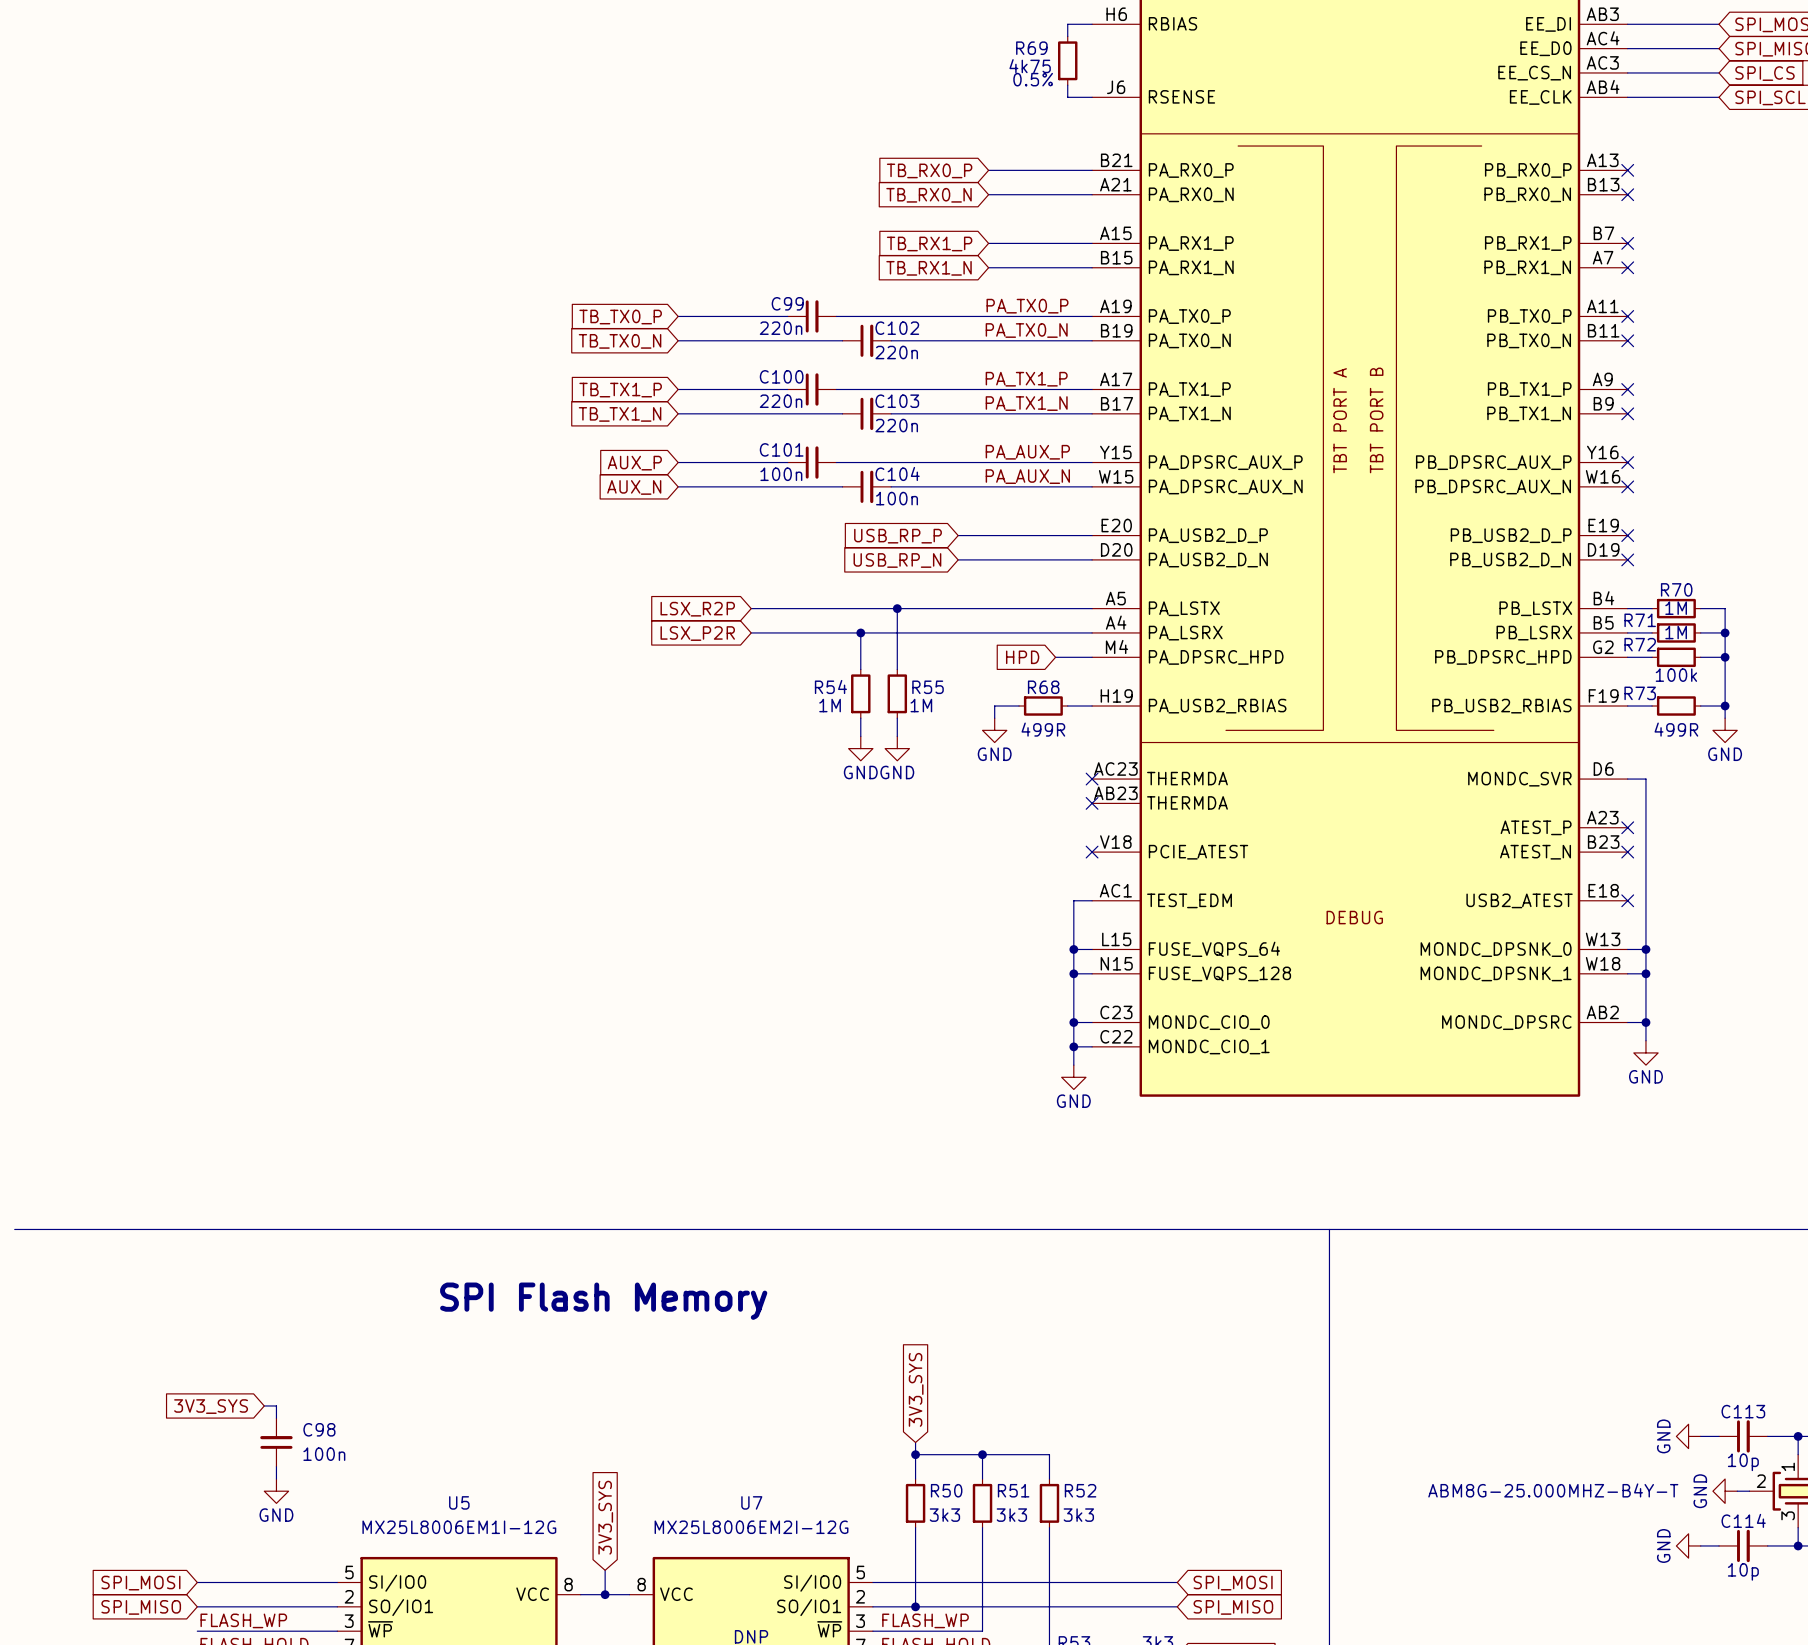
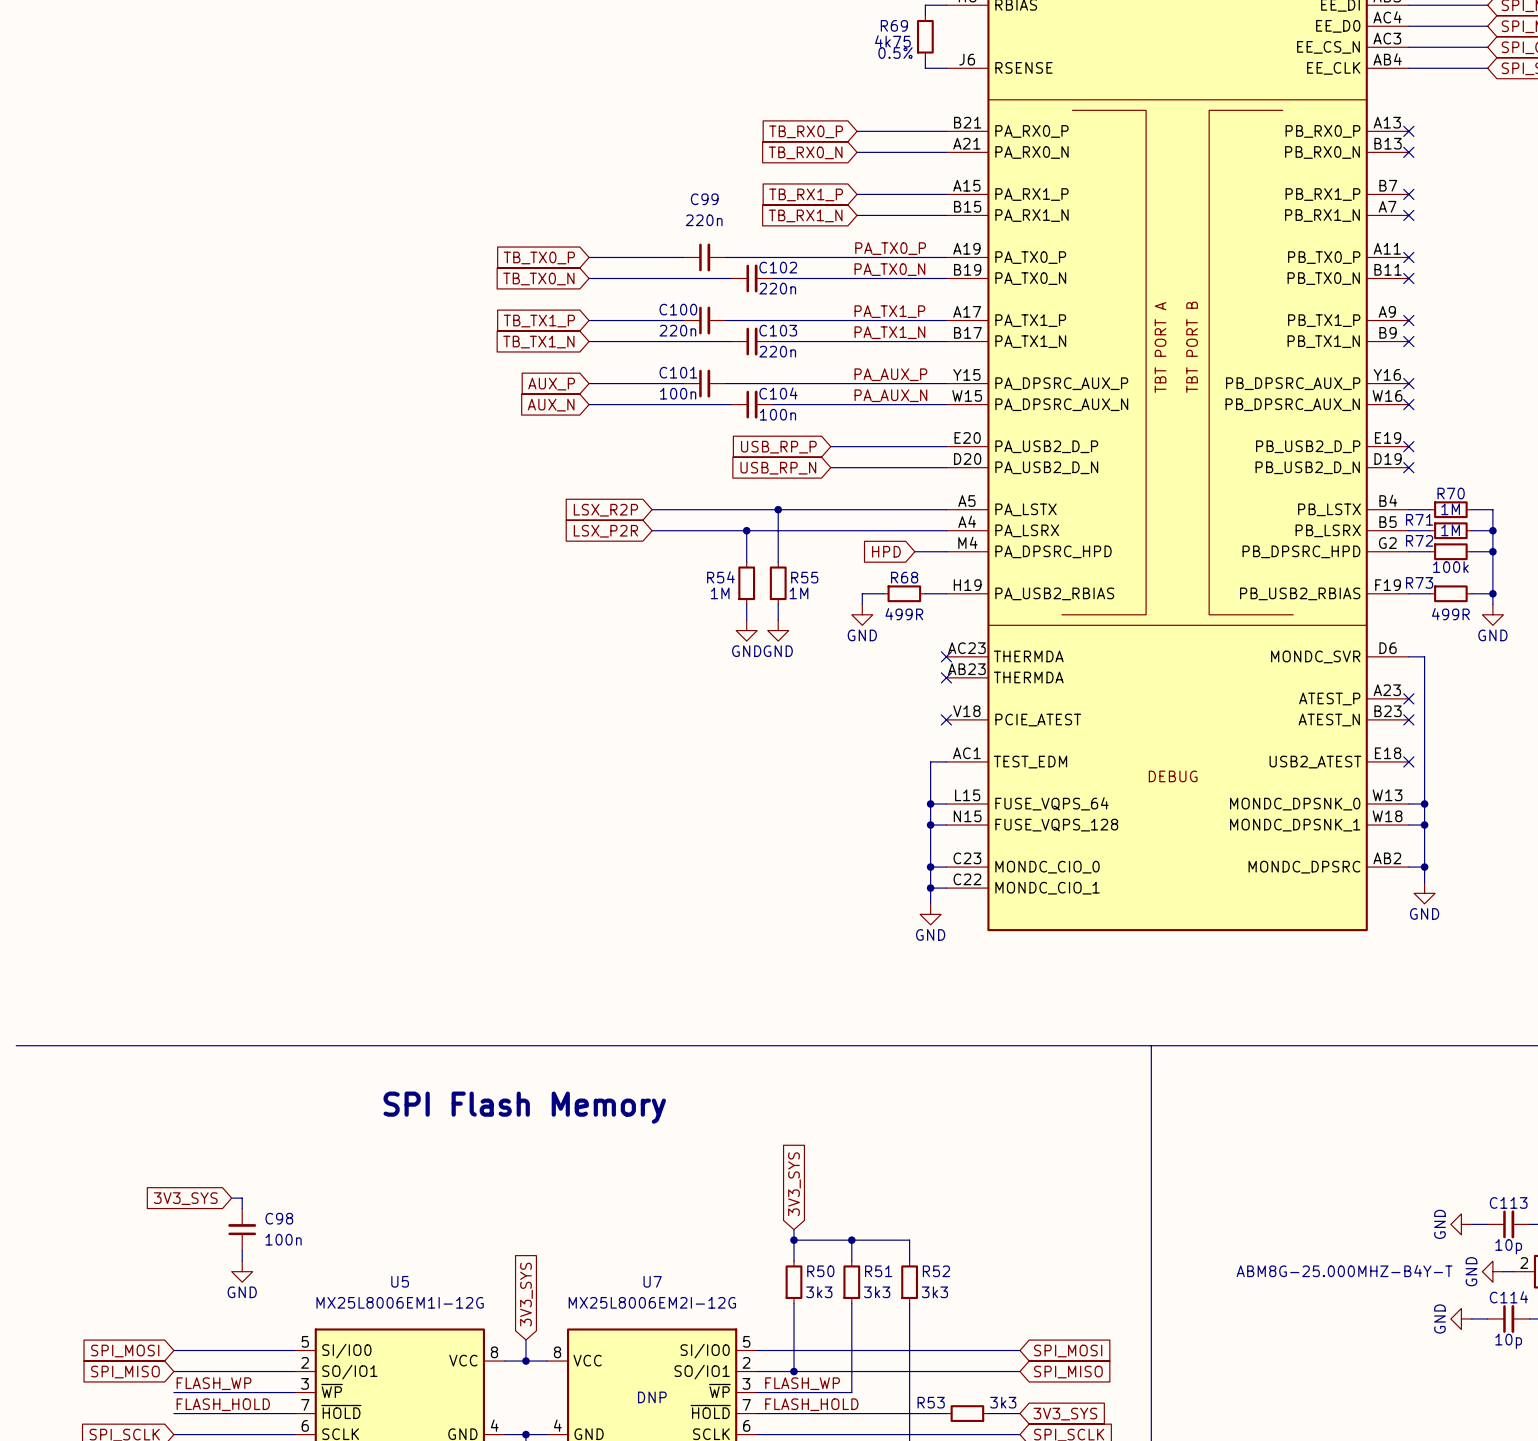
C99 name position: C99 (787, 303) -> C99 (704, 199)
C99 text position: 220n (781, 328) -> 220n (704, 220)

